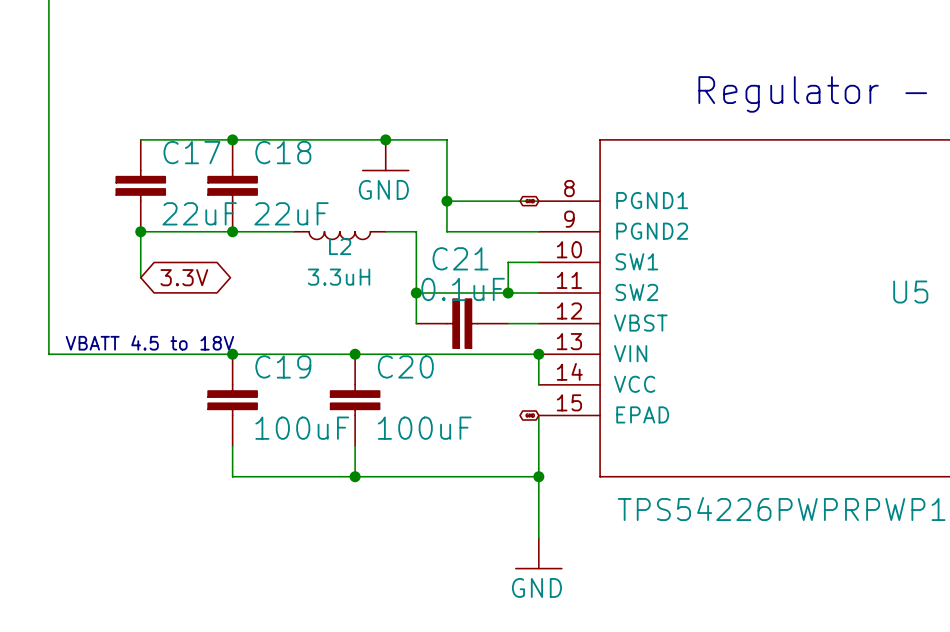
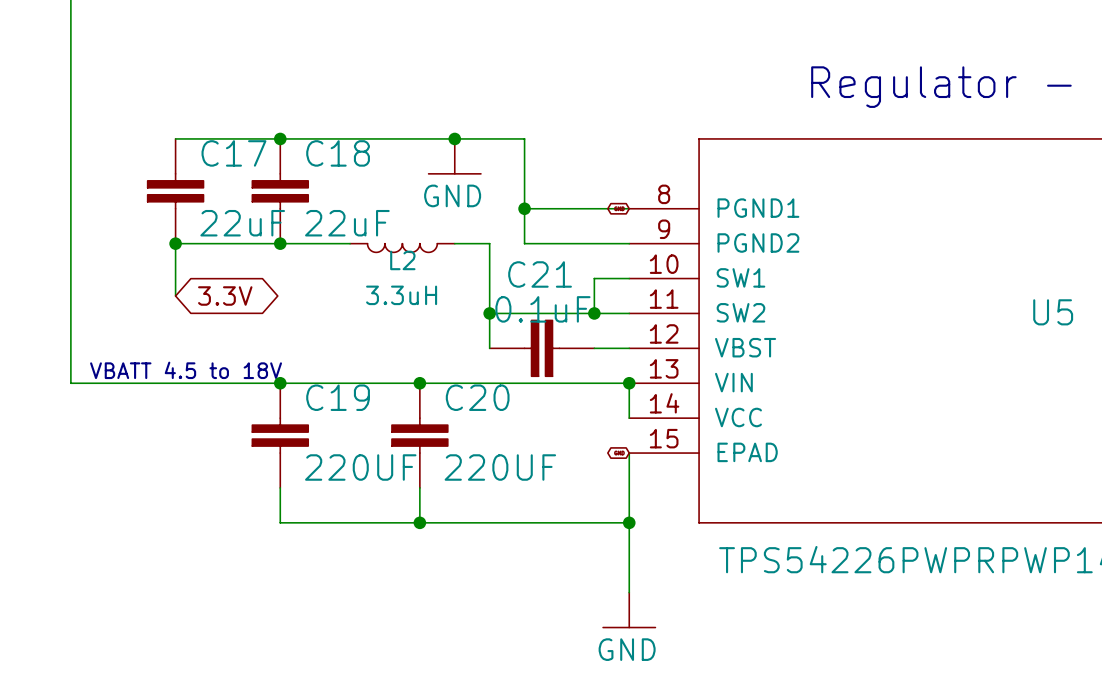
C19 value: 100uF (302, 428) -> 220UF (360, 467)
C20 value: 100uF (424, 428) -> 220UF (500, 467)

